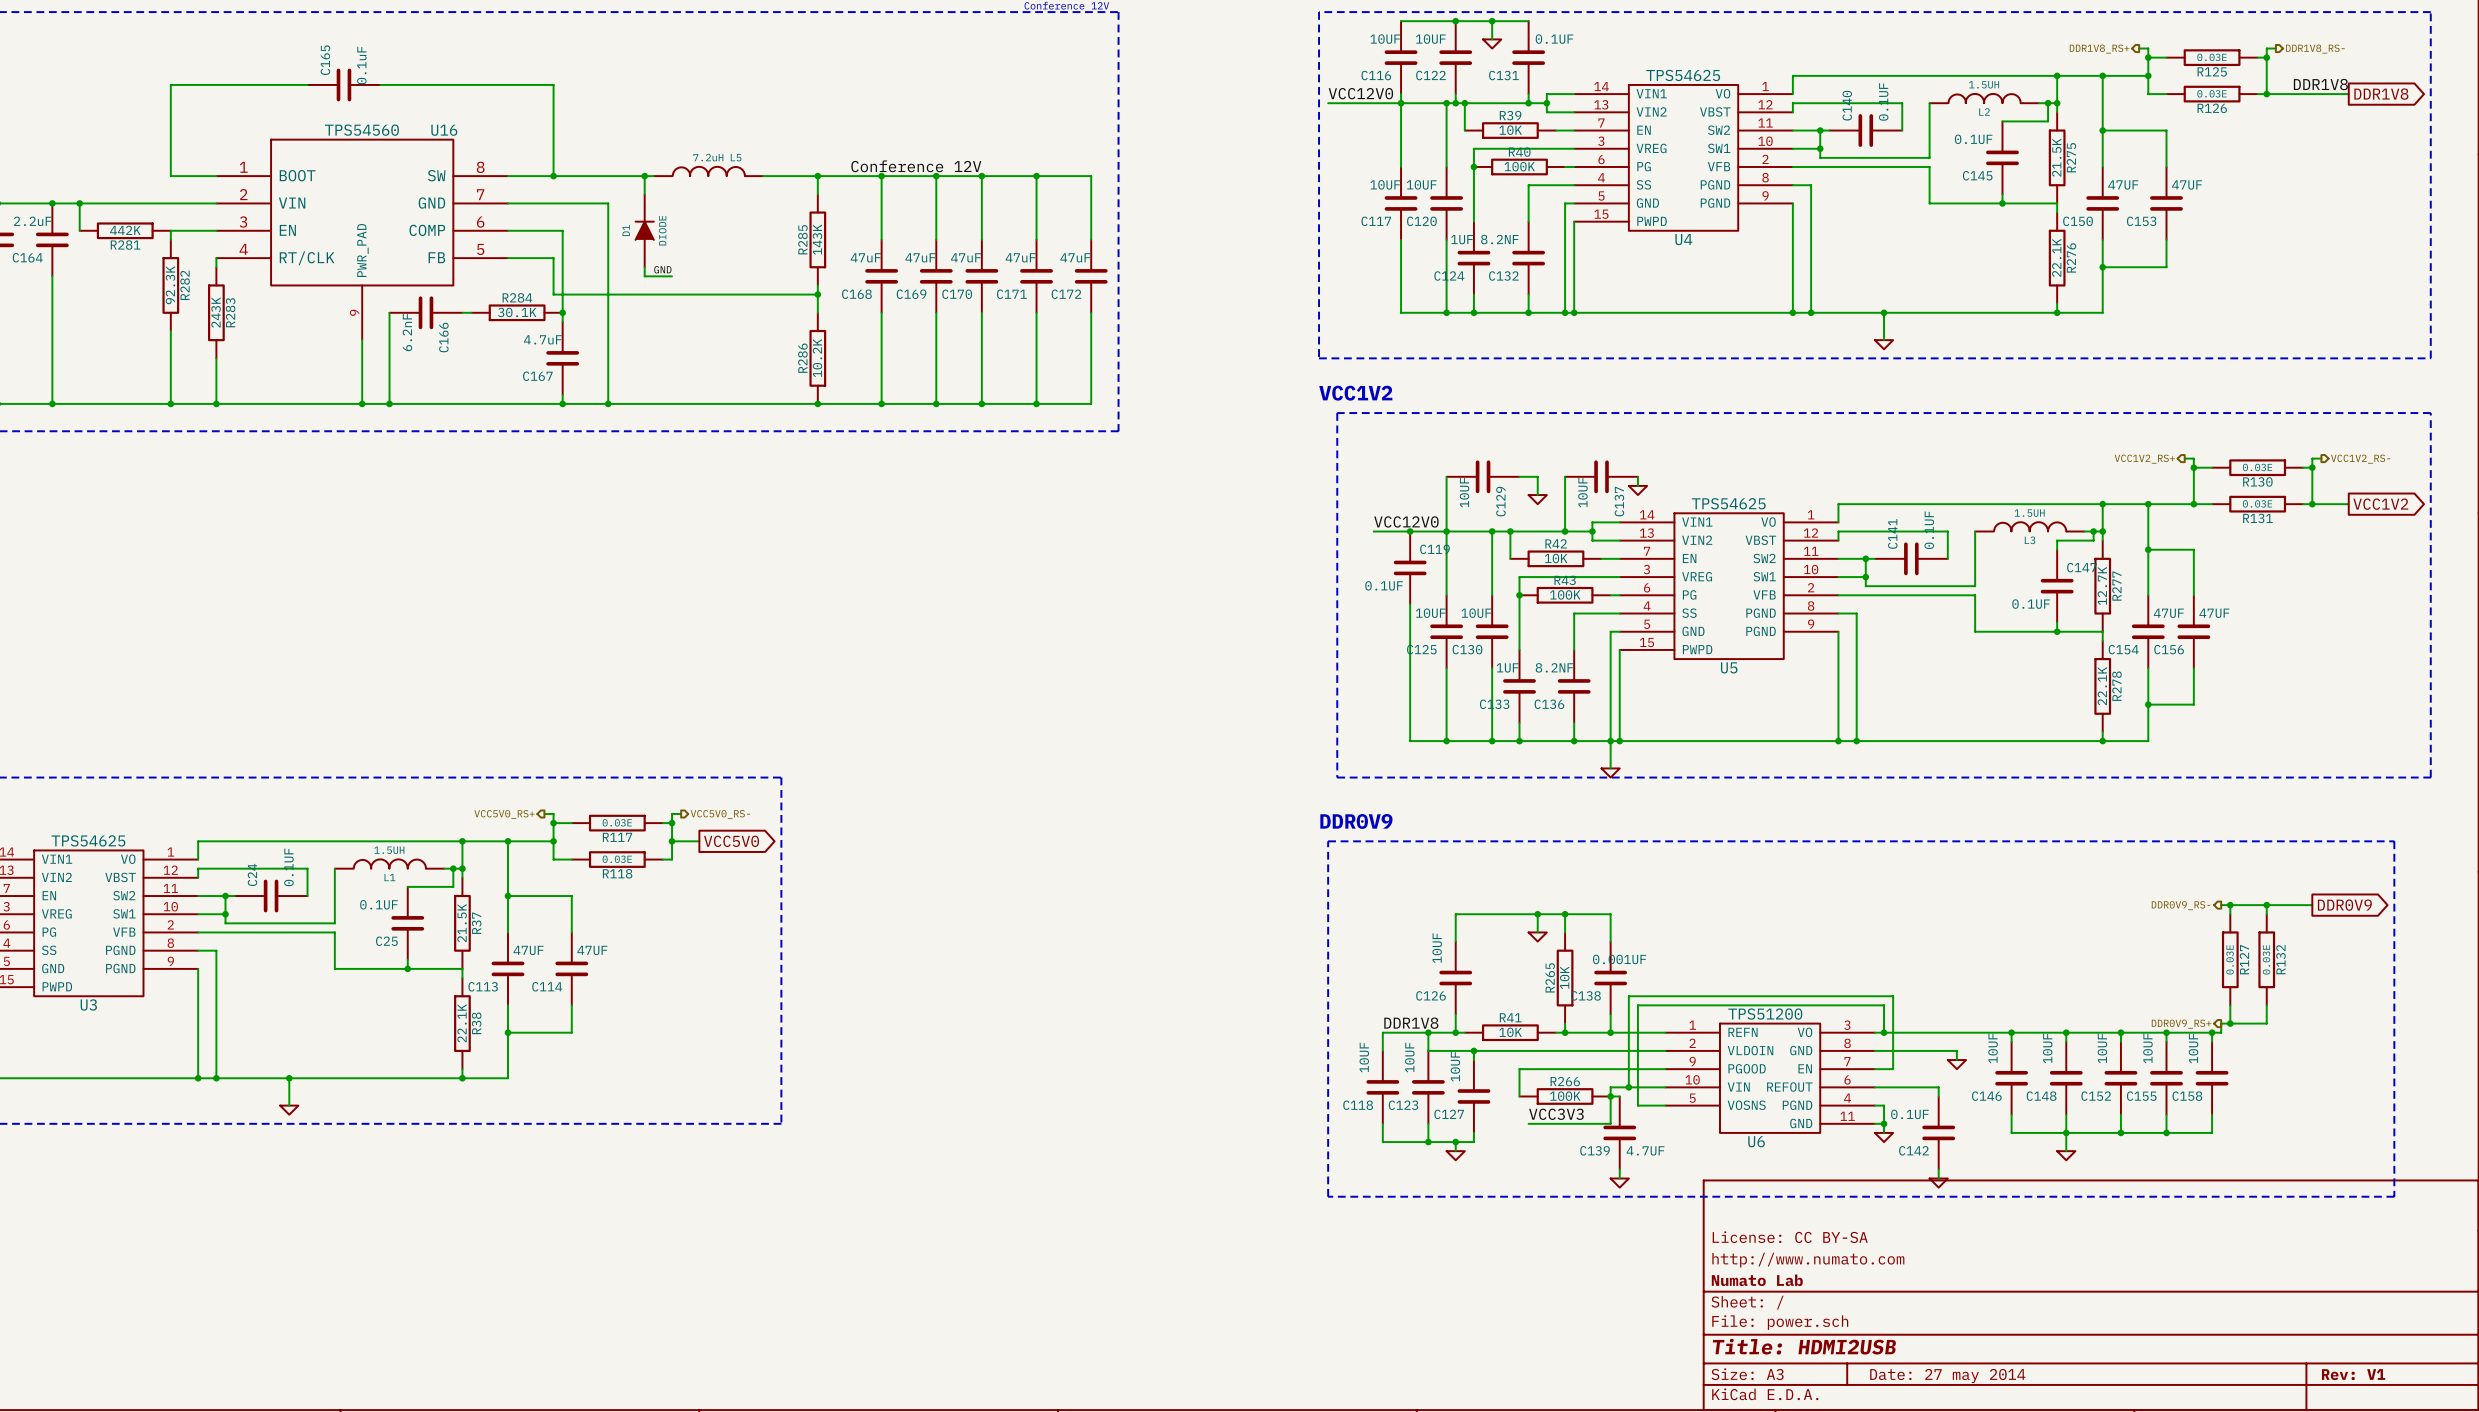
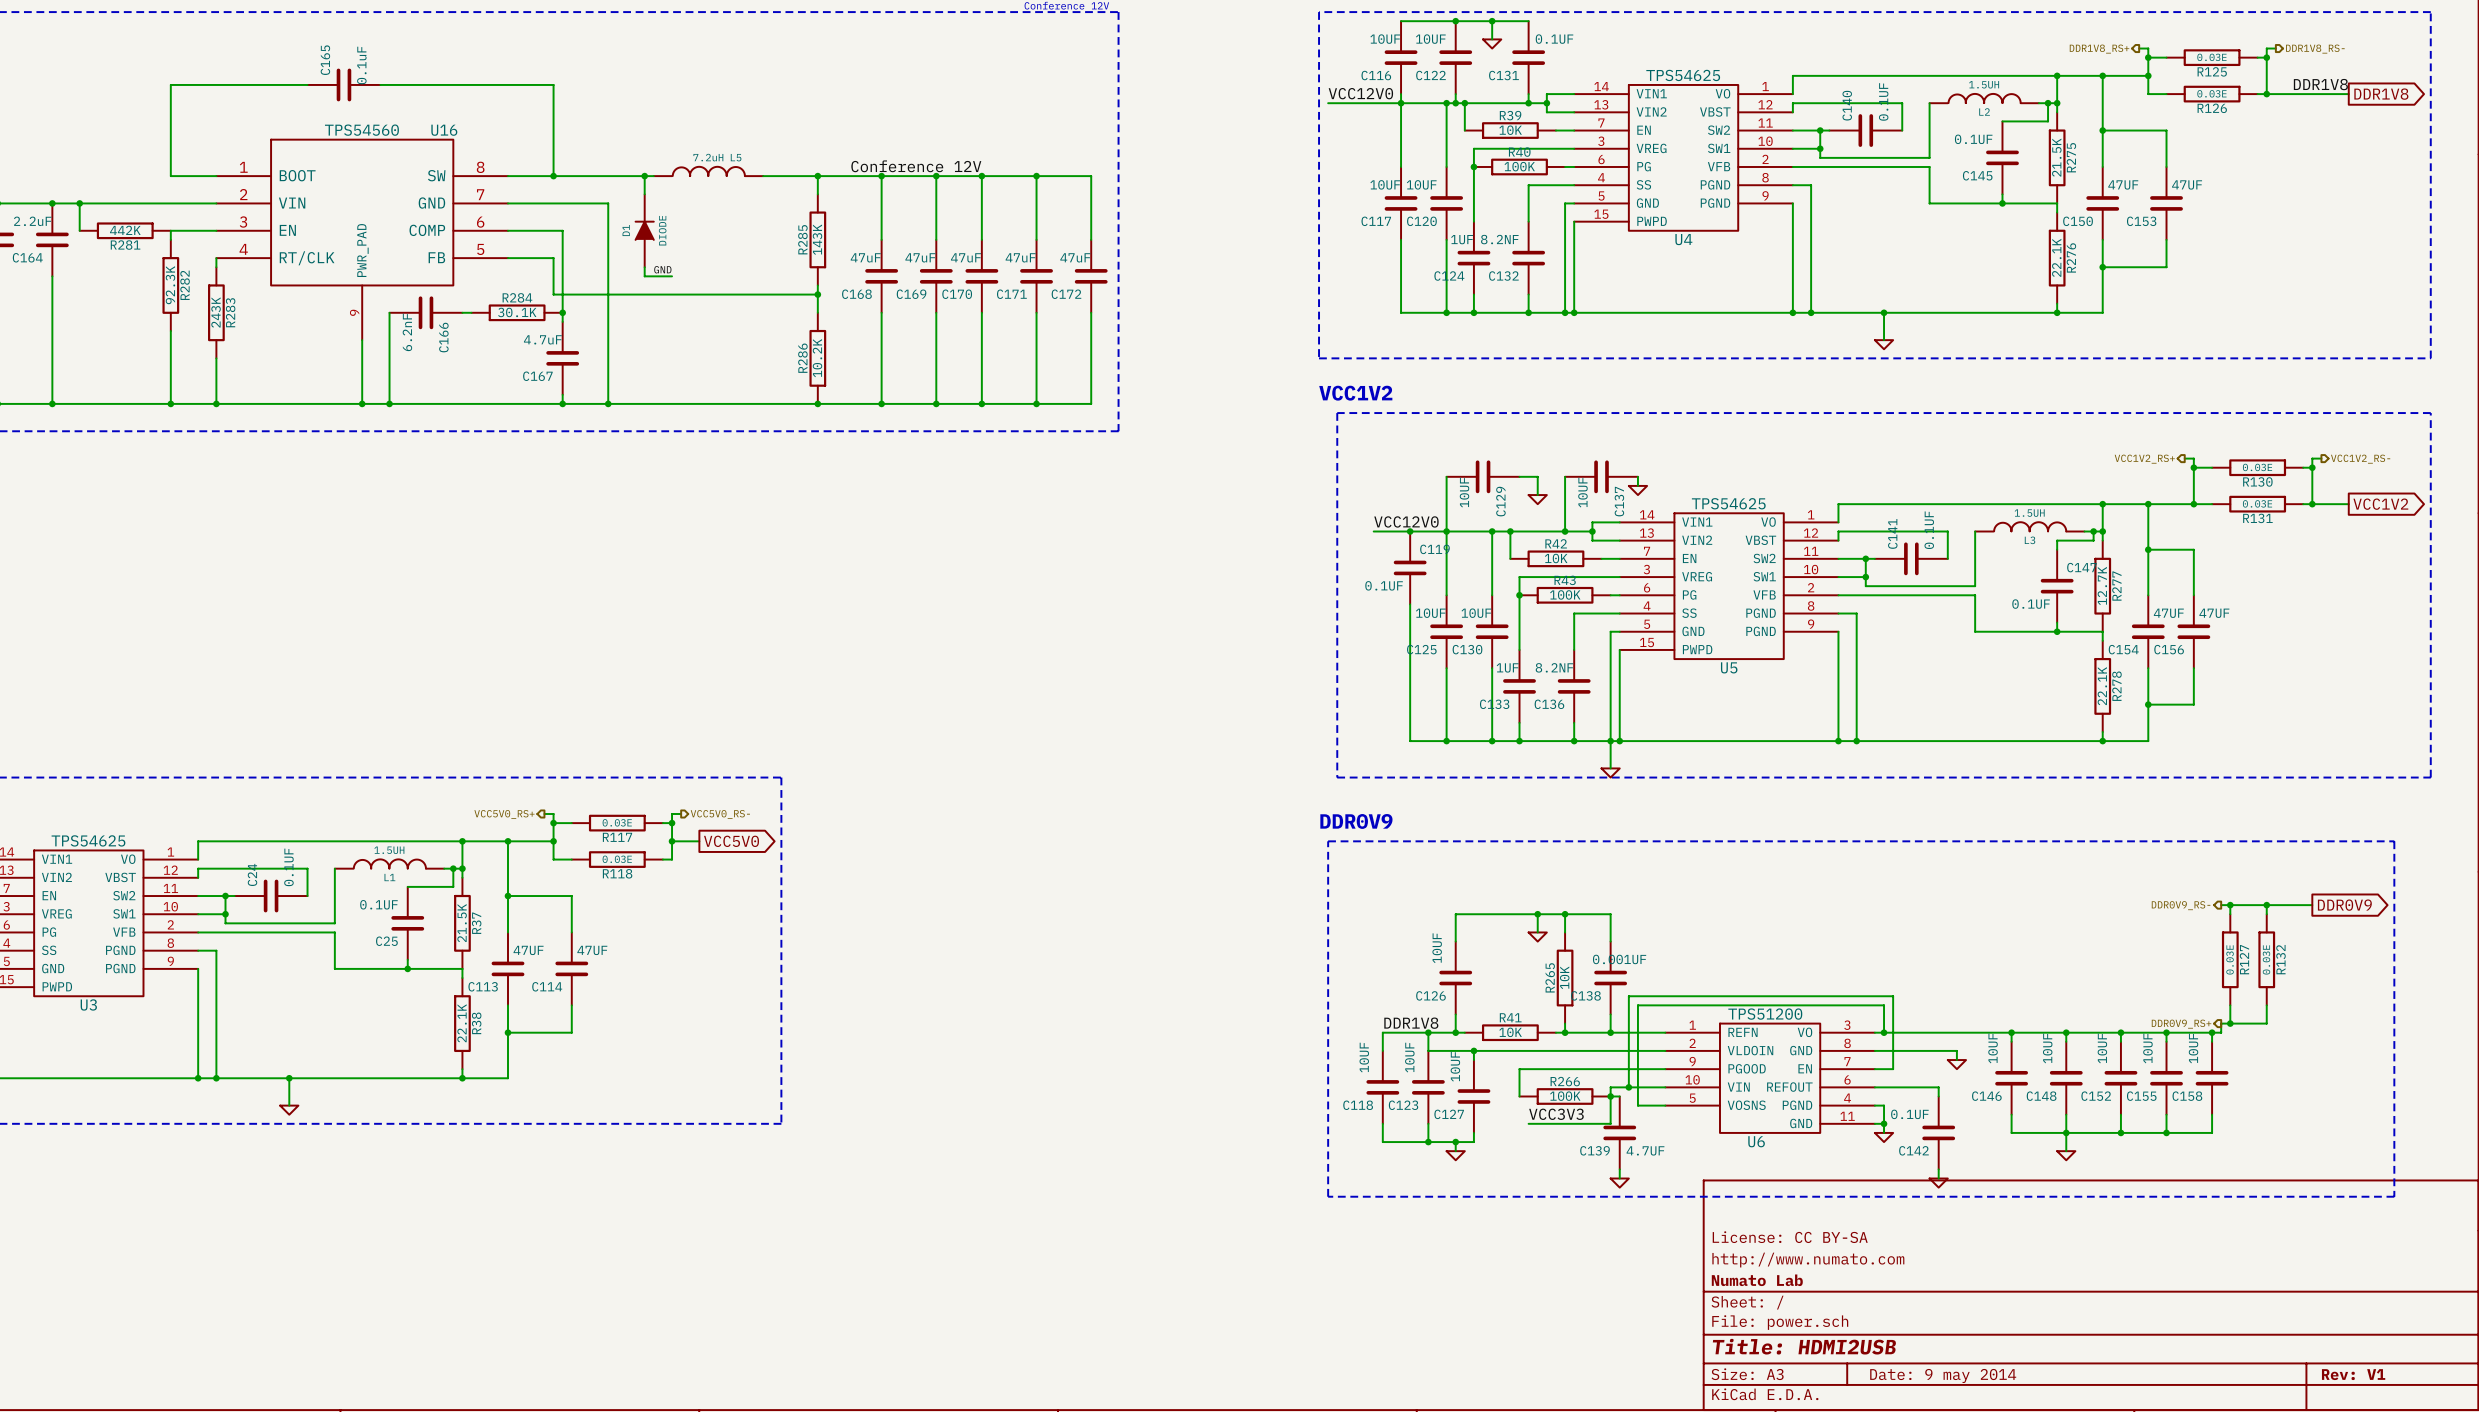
title block: Date: 27 may 2014 (1947, 1375) -> Date: 9 may 2014 (1943, 1375)

